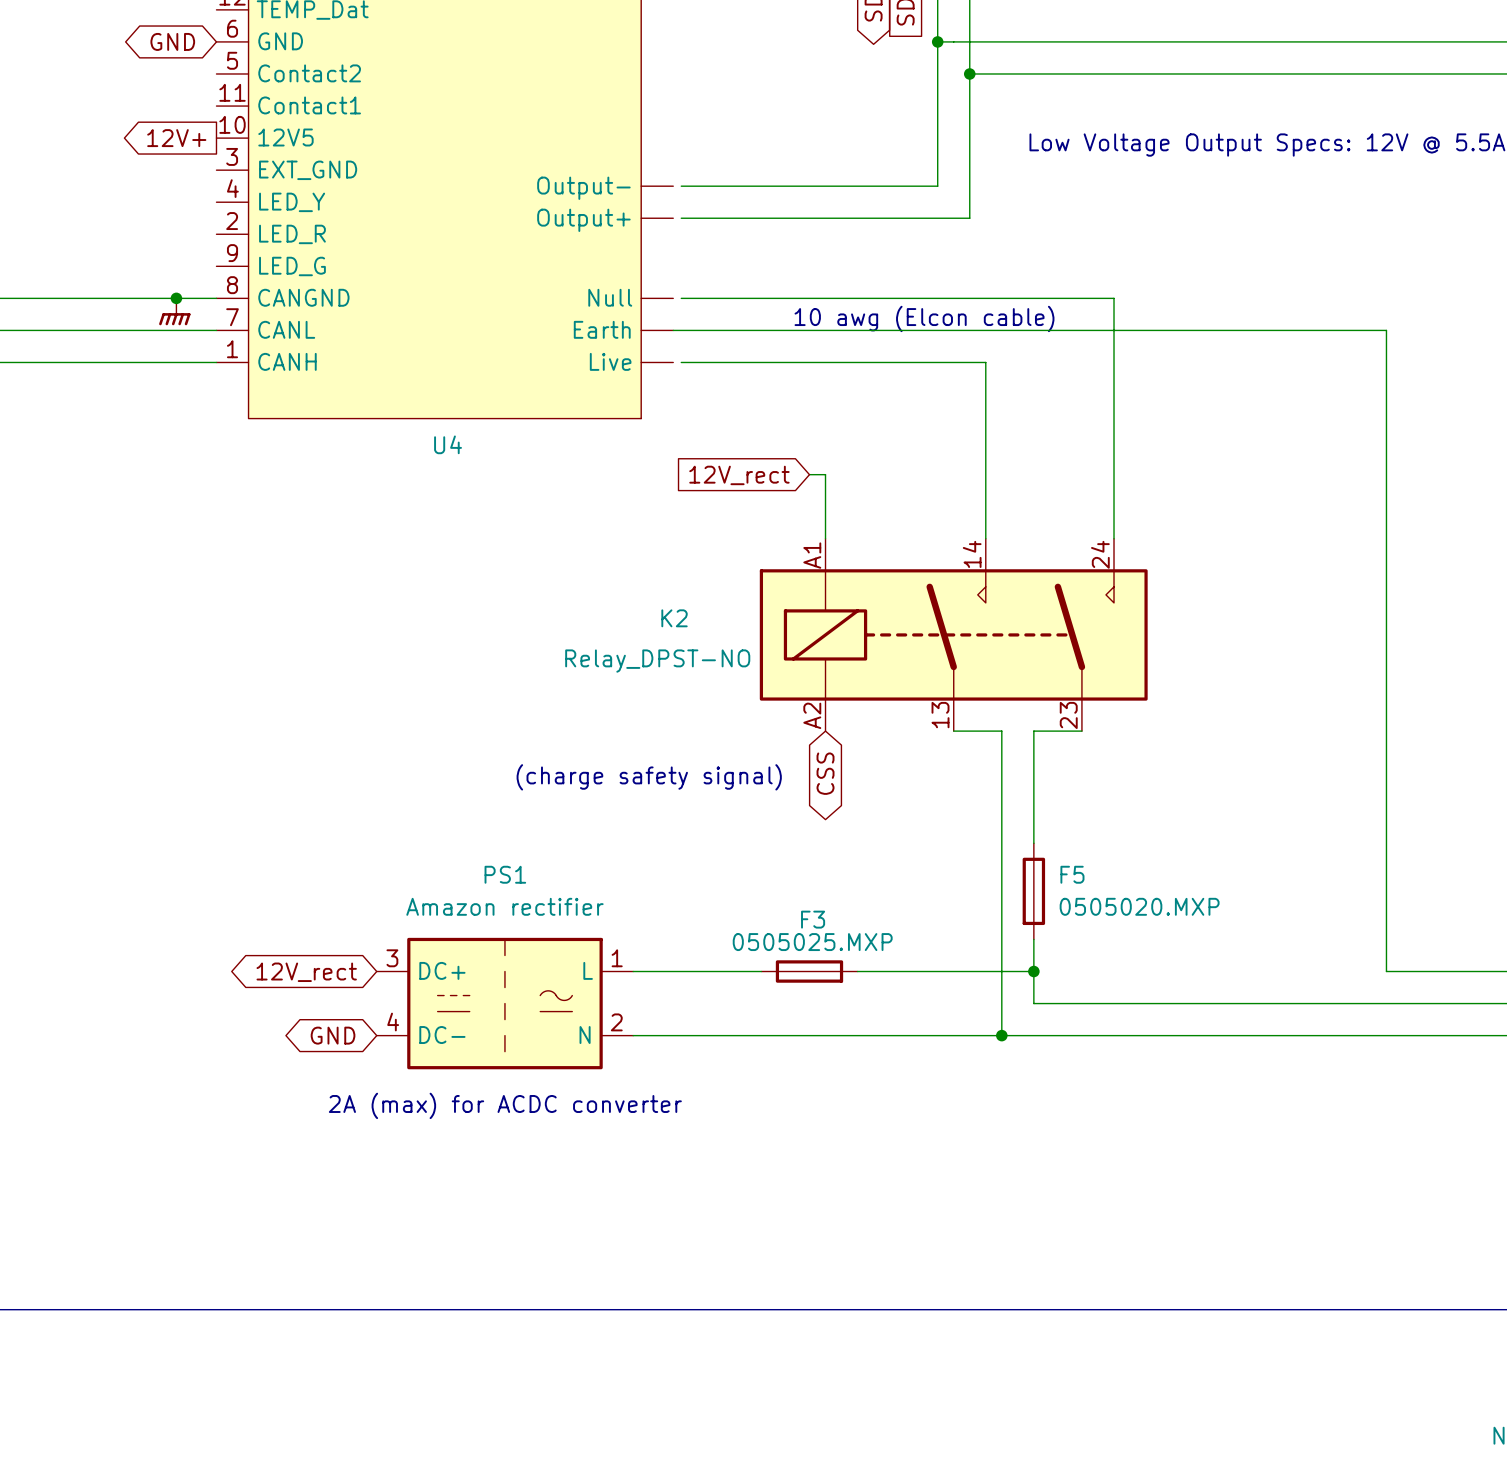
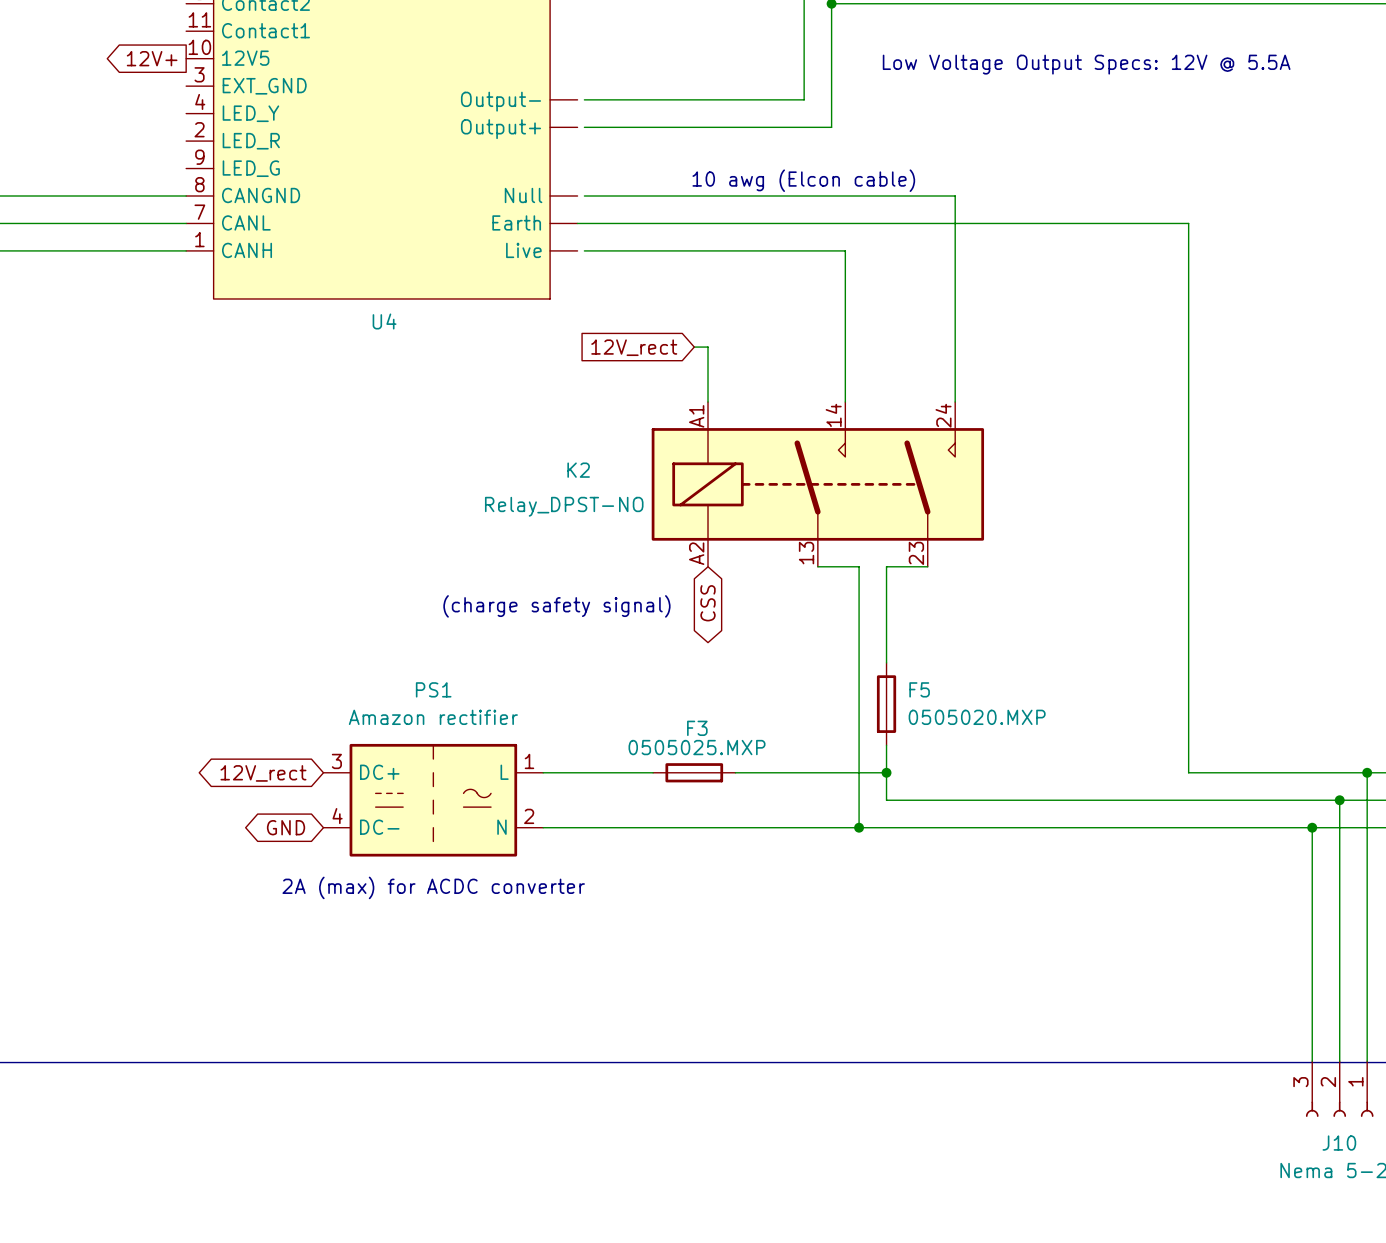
junction: (176, 298) -> none
power symbol: (174, 311) -> none
text position: 10 awg (Elcon cable) (924, 318) -> 10 awg (Elcon cable) (803, 180)

